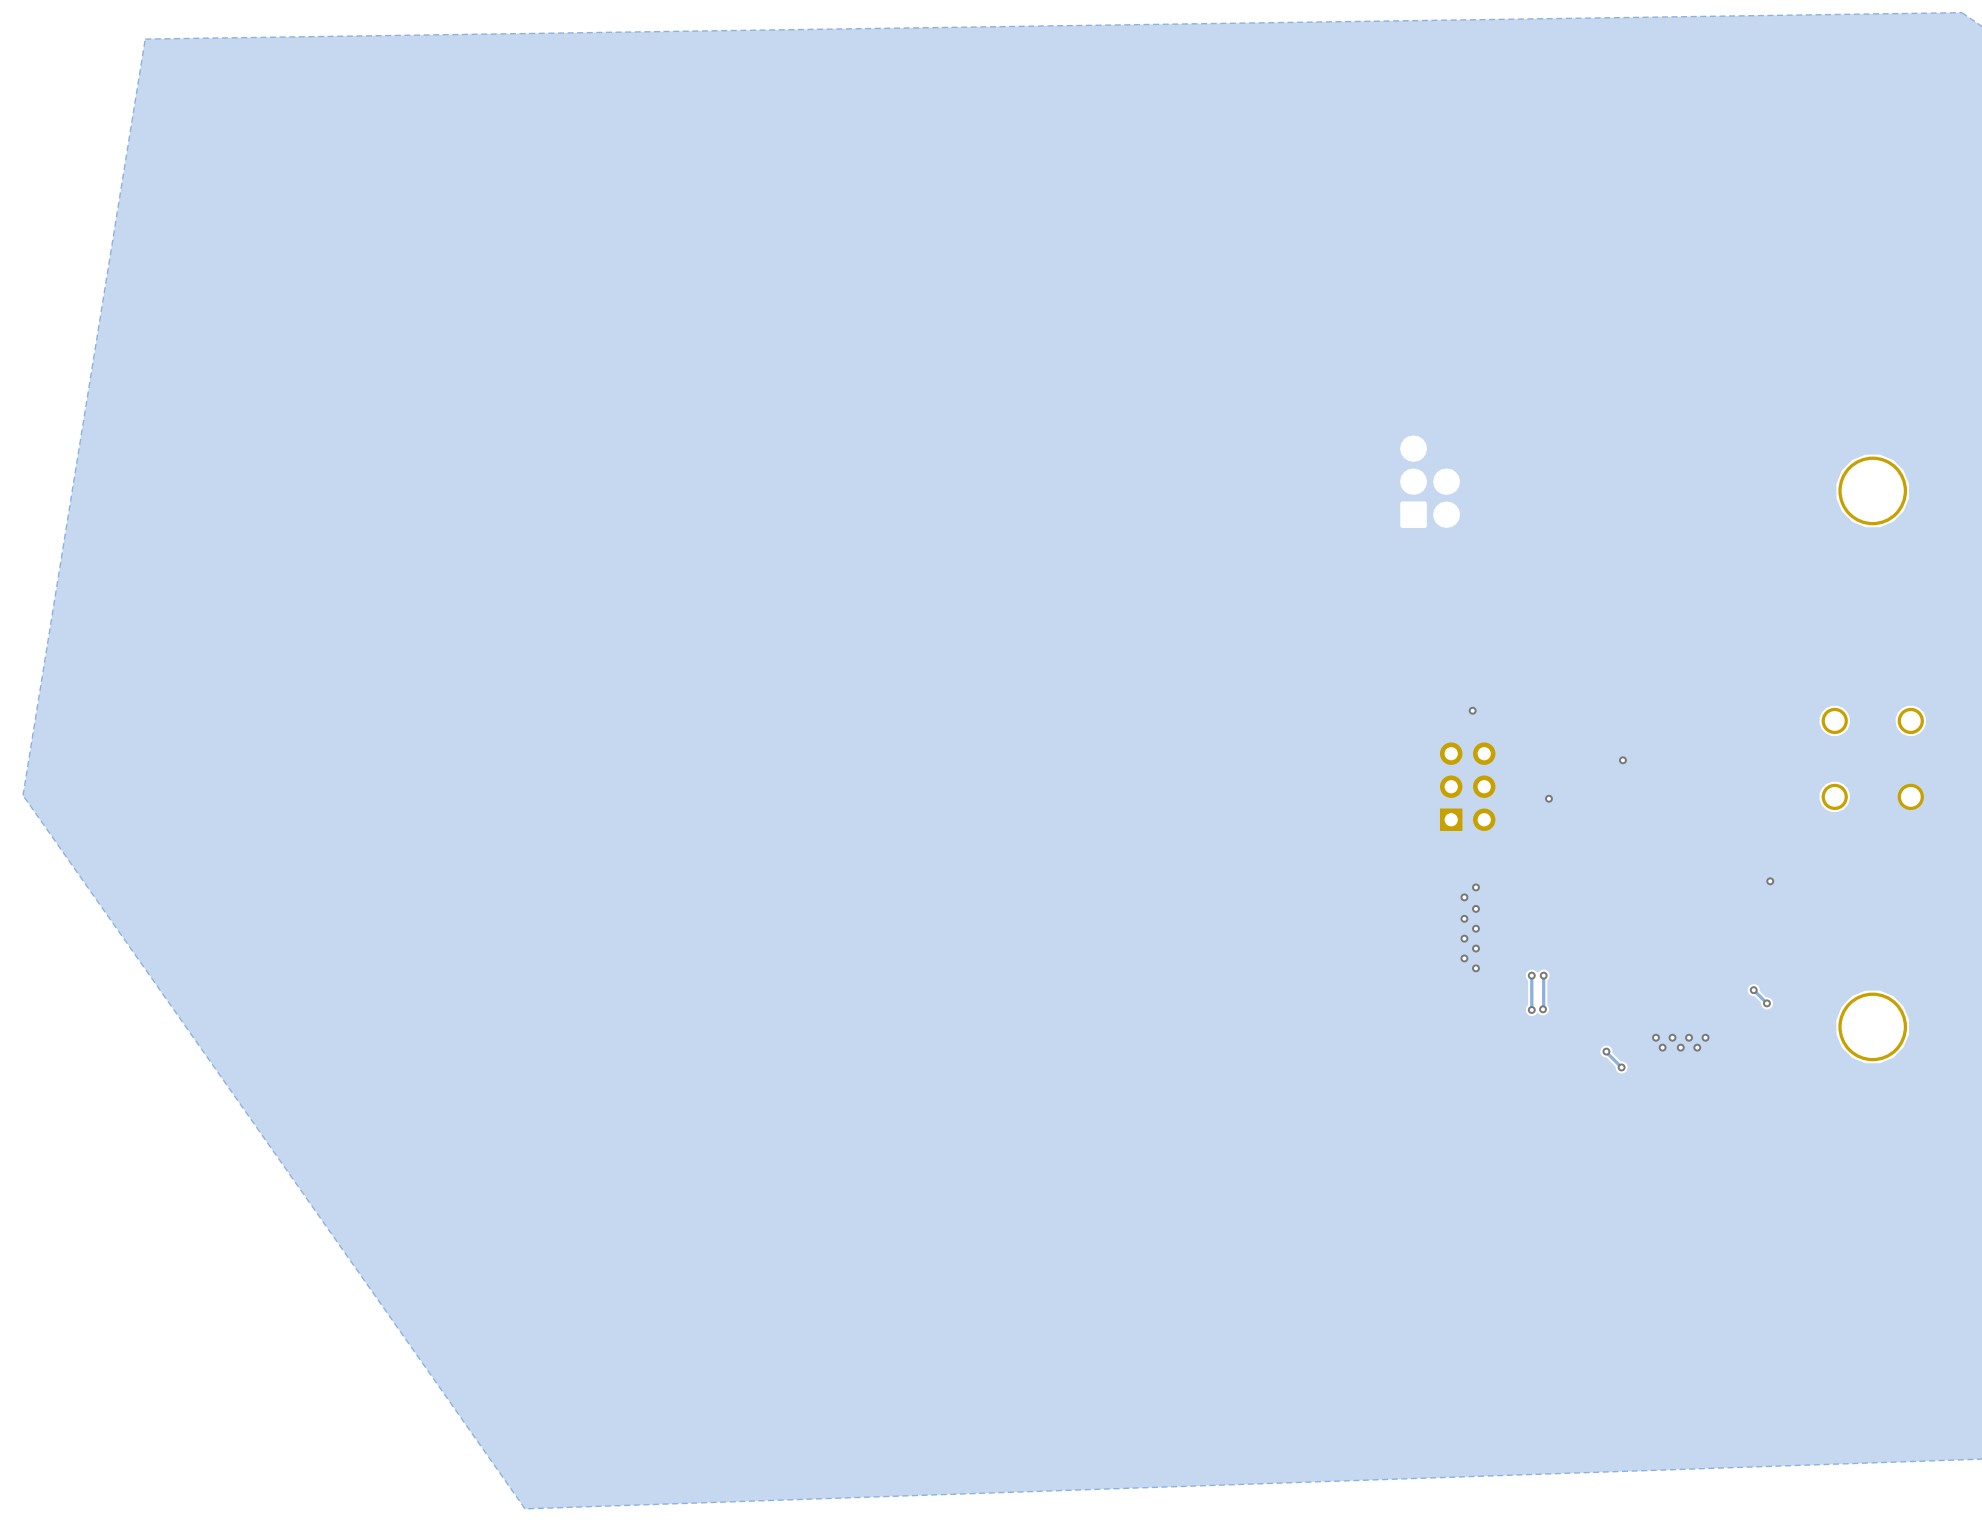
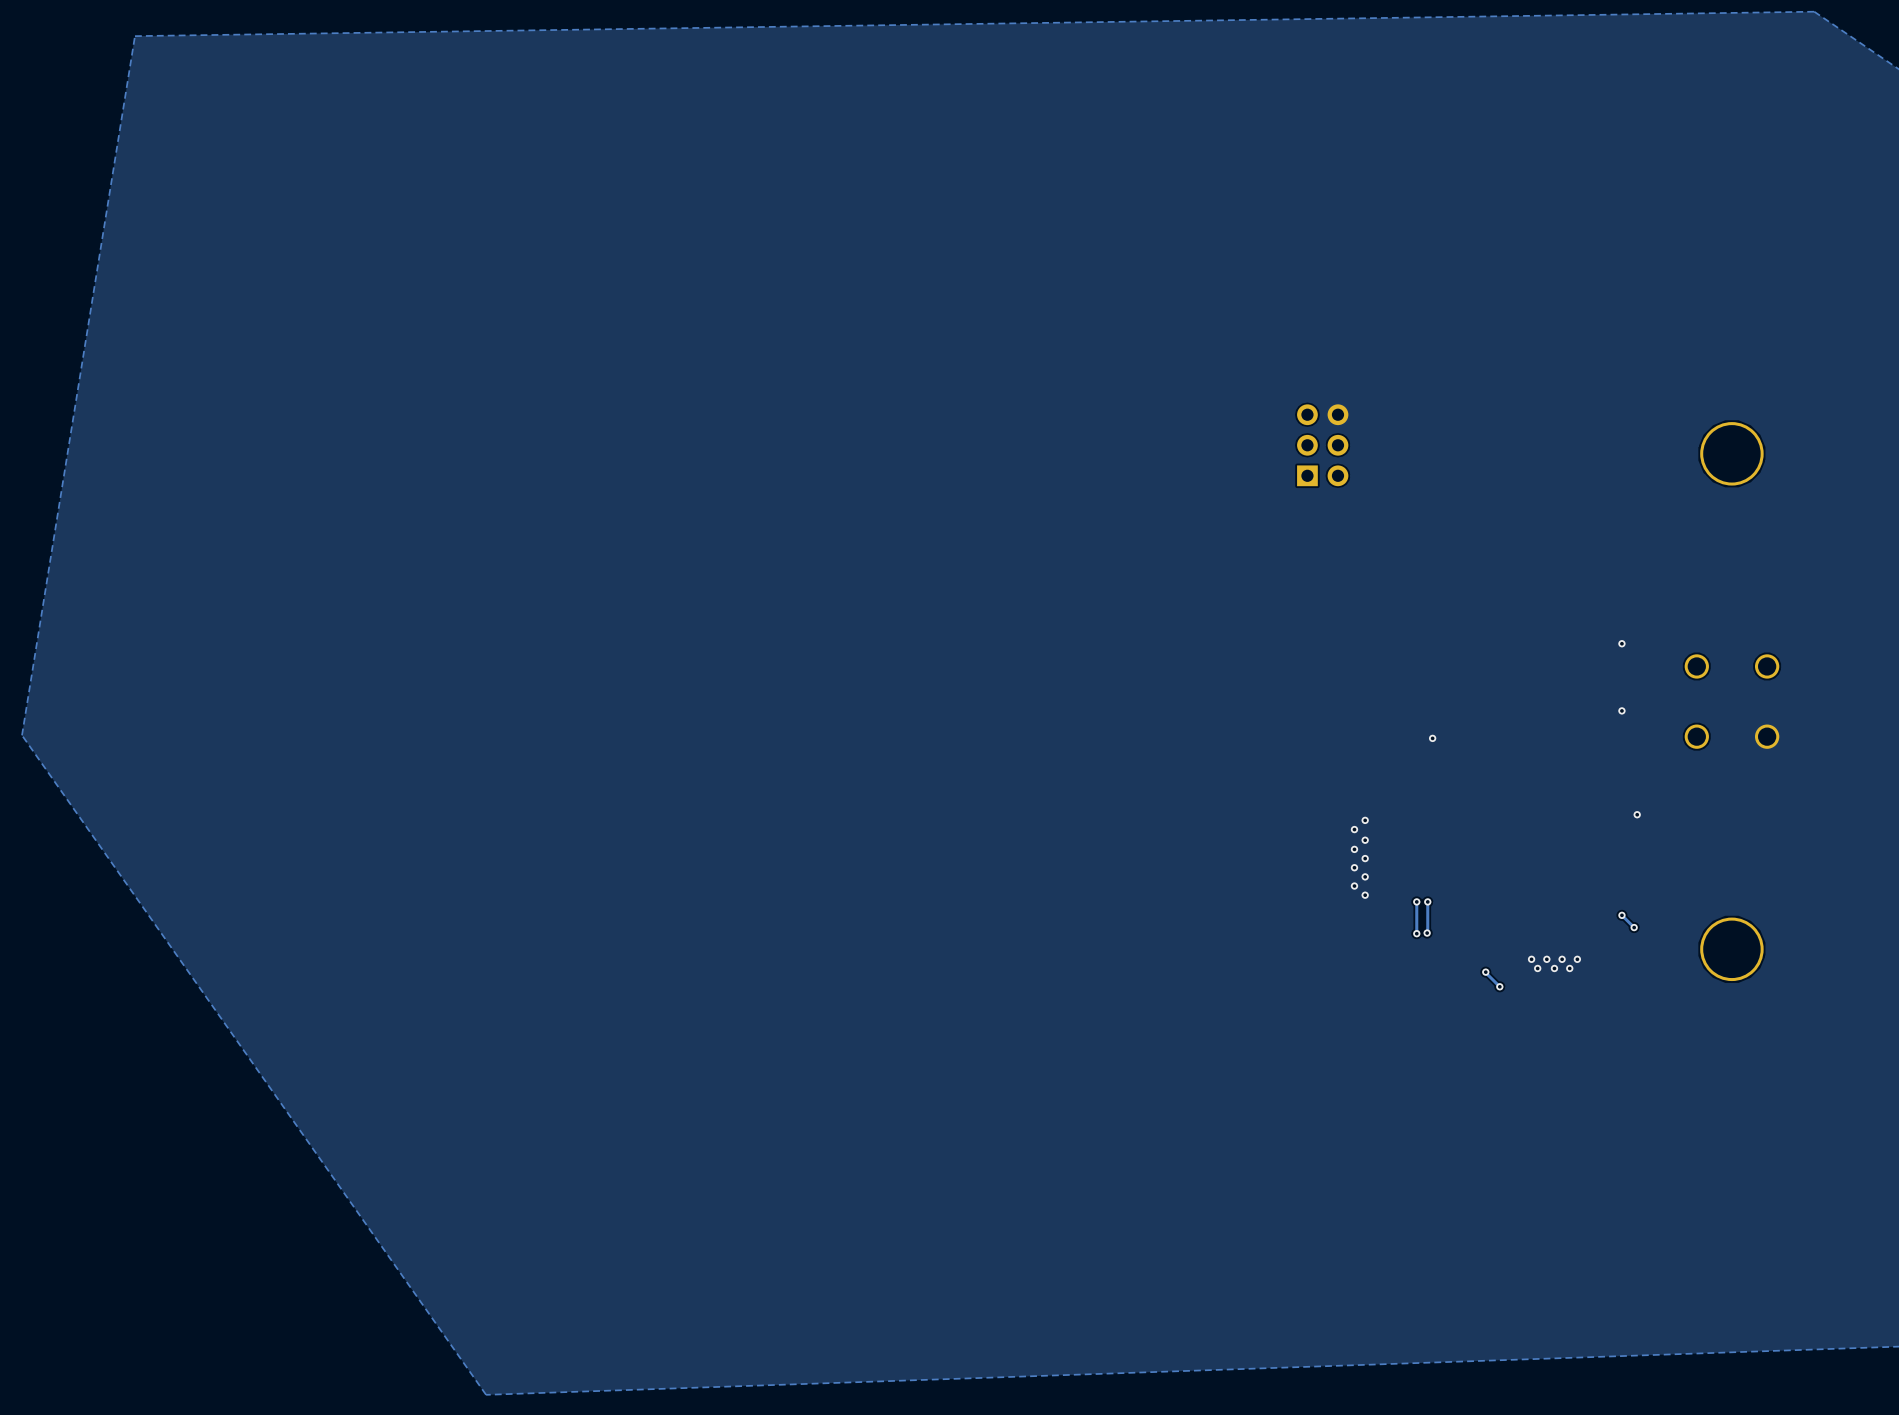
via: none -> (1621, 643)
via: (1472, 710) -> none
via: (1622, 760) -> none
via: none -> (1621, 710)
part position: (1467, 786) -> (1322, 445)

